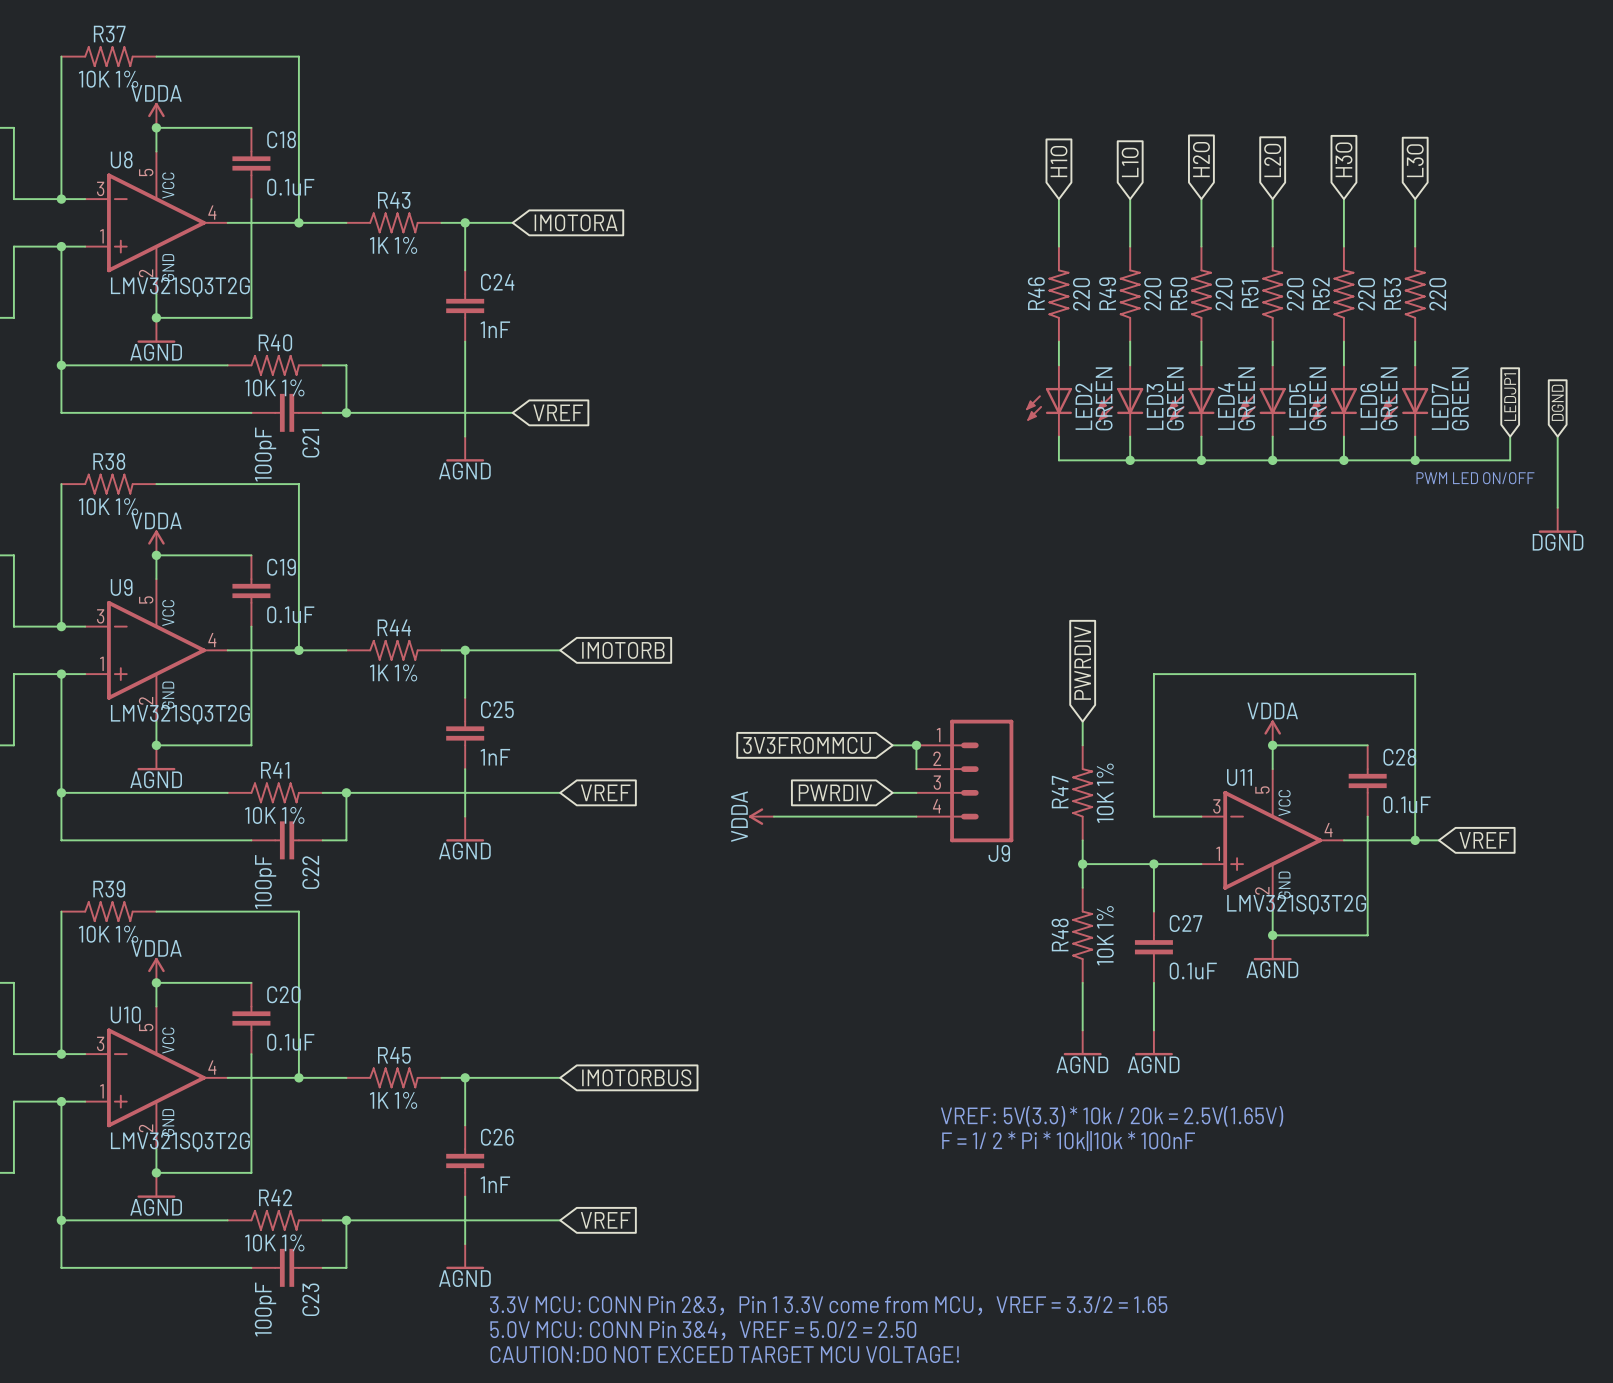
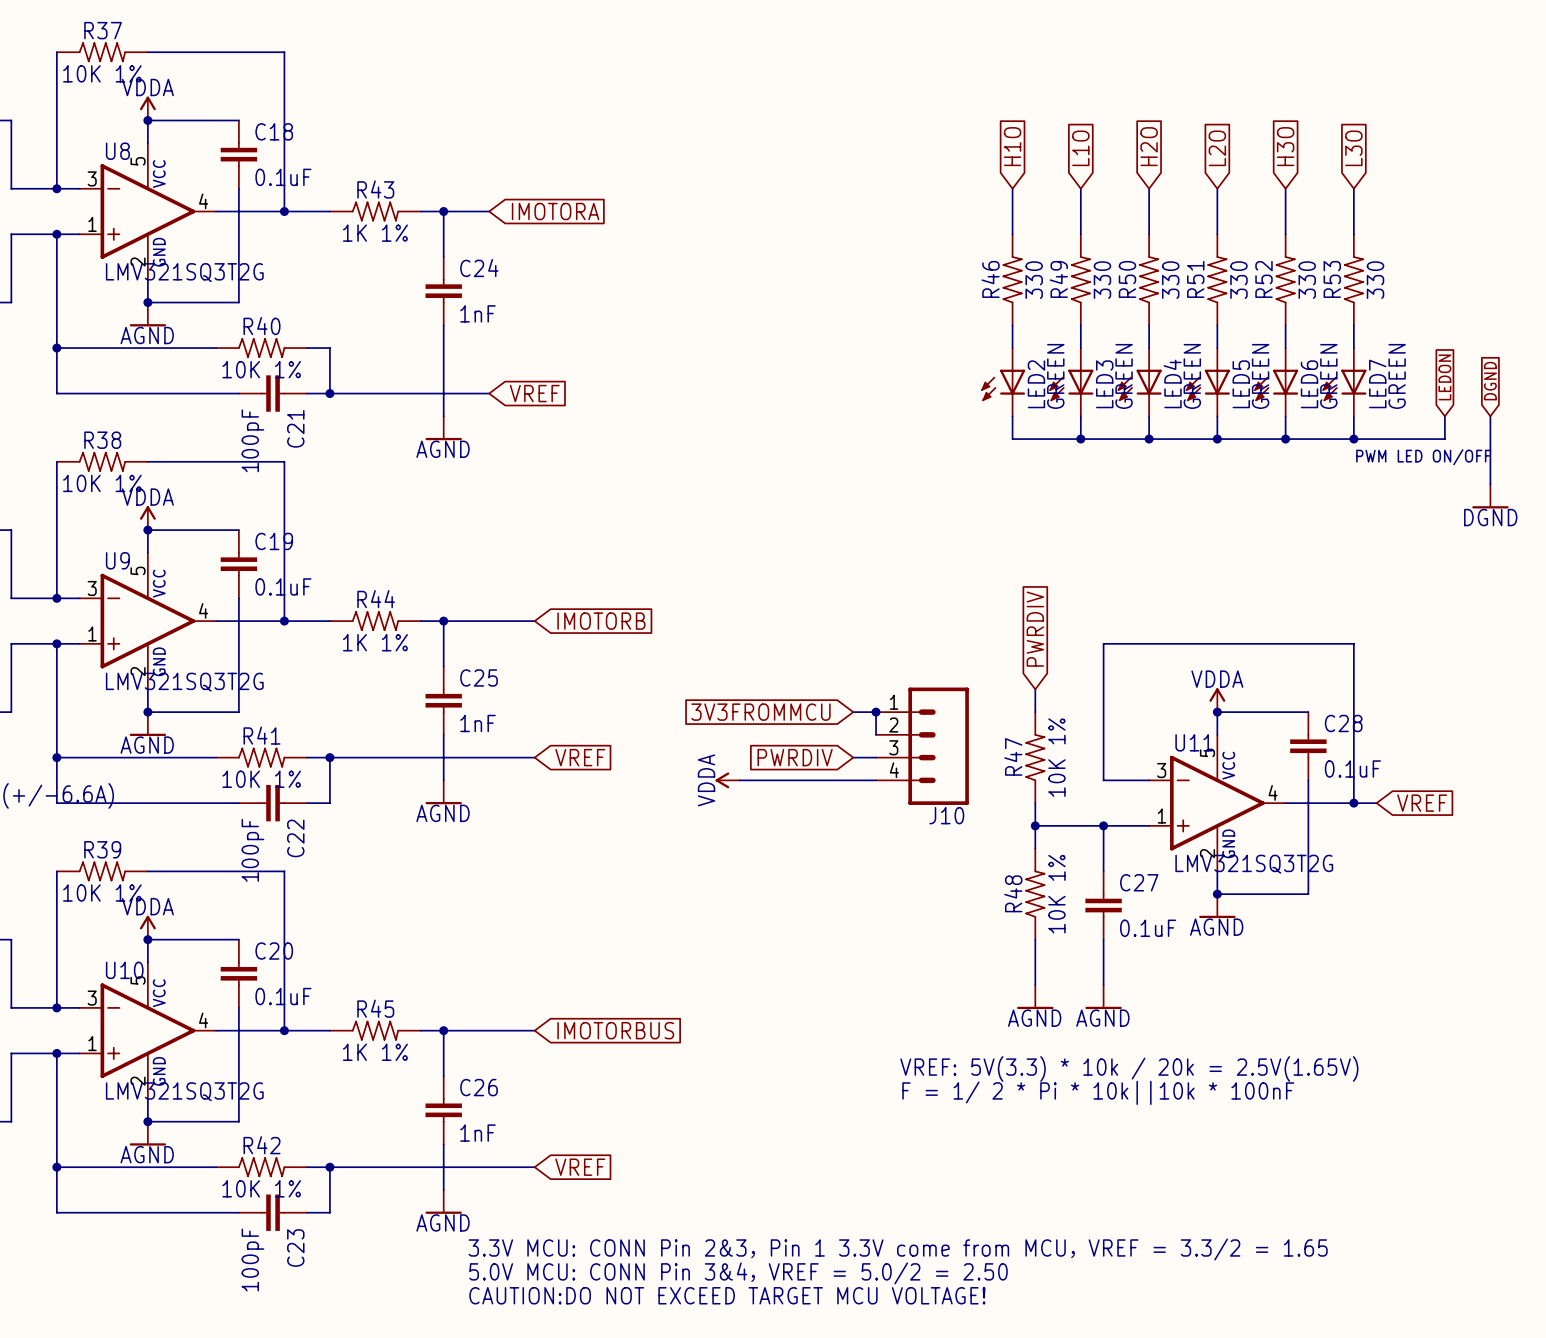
R46 value: 220 (1081, 294) -> 330 (1034, 280)
R49 value: 220 (1152, 294) -> 330 (1102, 280)
R50 value: 220 (1224, 294) -> 330 (1170, 280)
R51 value: 220 (1295, 294) -> 330 (1238, 280)
R52 value: 220 (1366, 294) -> 330 (1307, 280)
R53 value: 220 (1437, 294) -> 330 (1375, 280)
global label: LEDJP1 (1510, 397) -> LEDON (1444, 377)
J9 name: J9 (999, 853) -> J10 (946, 815)

